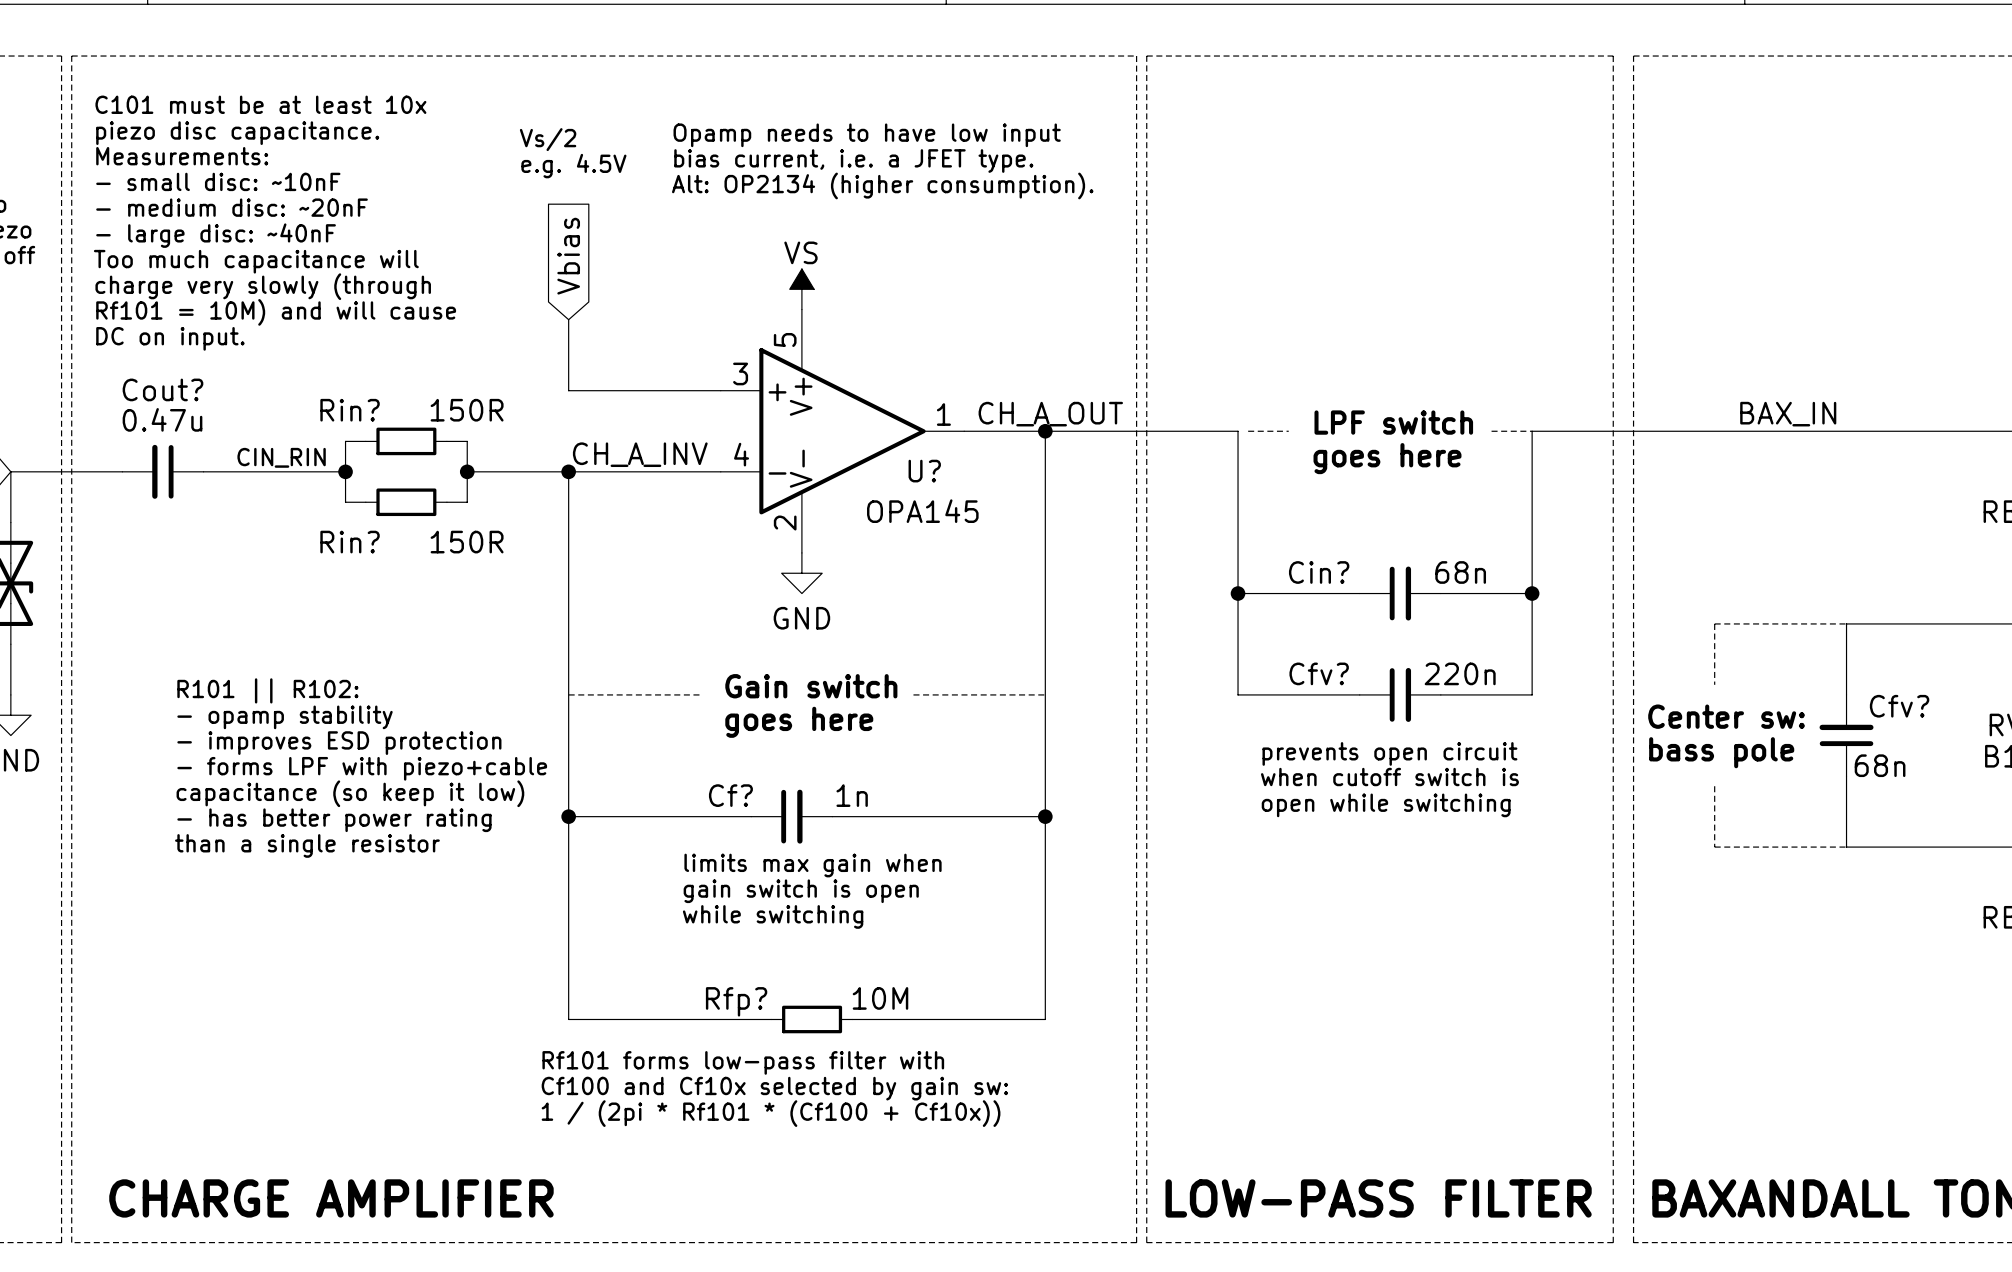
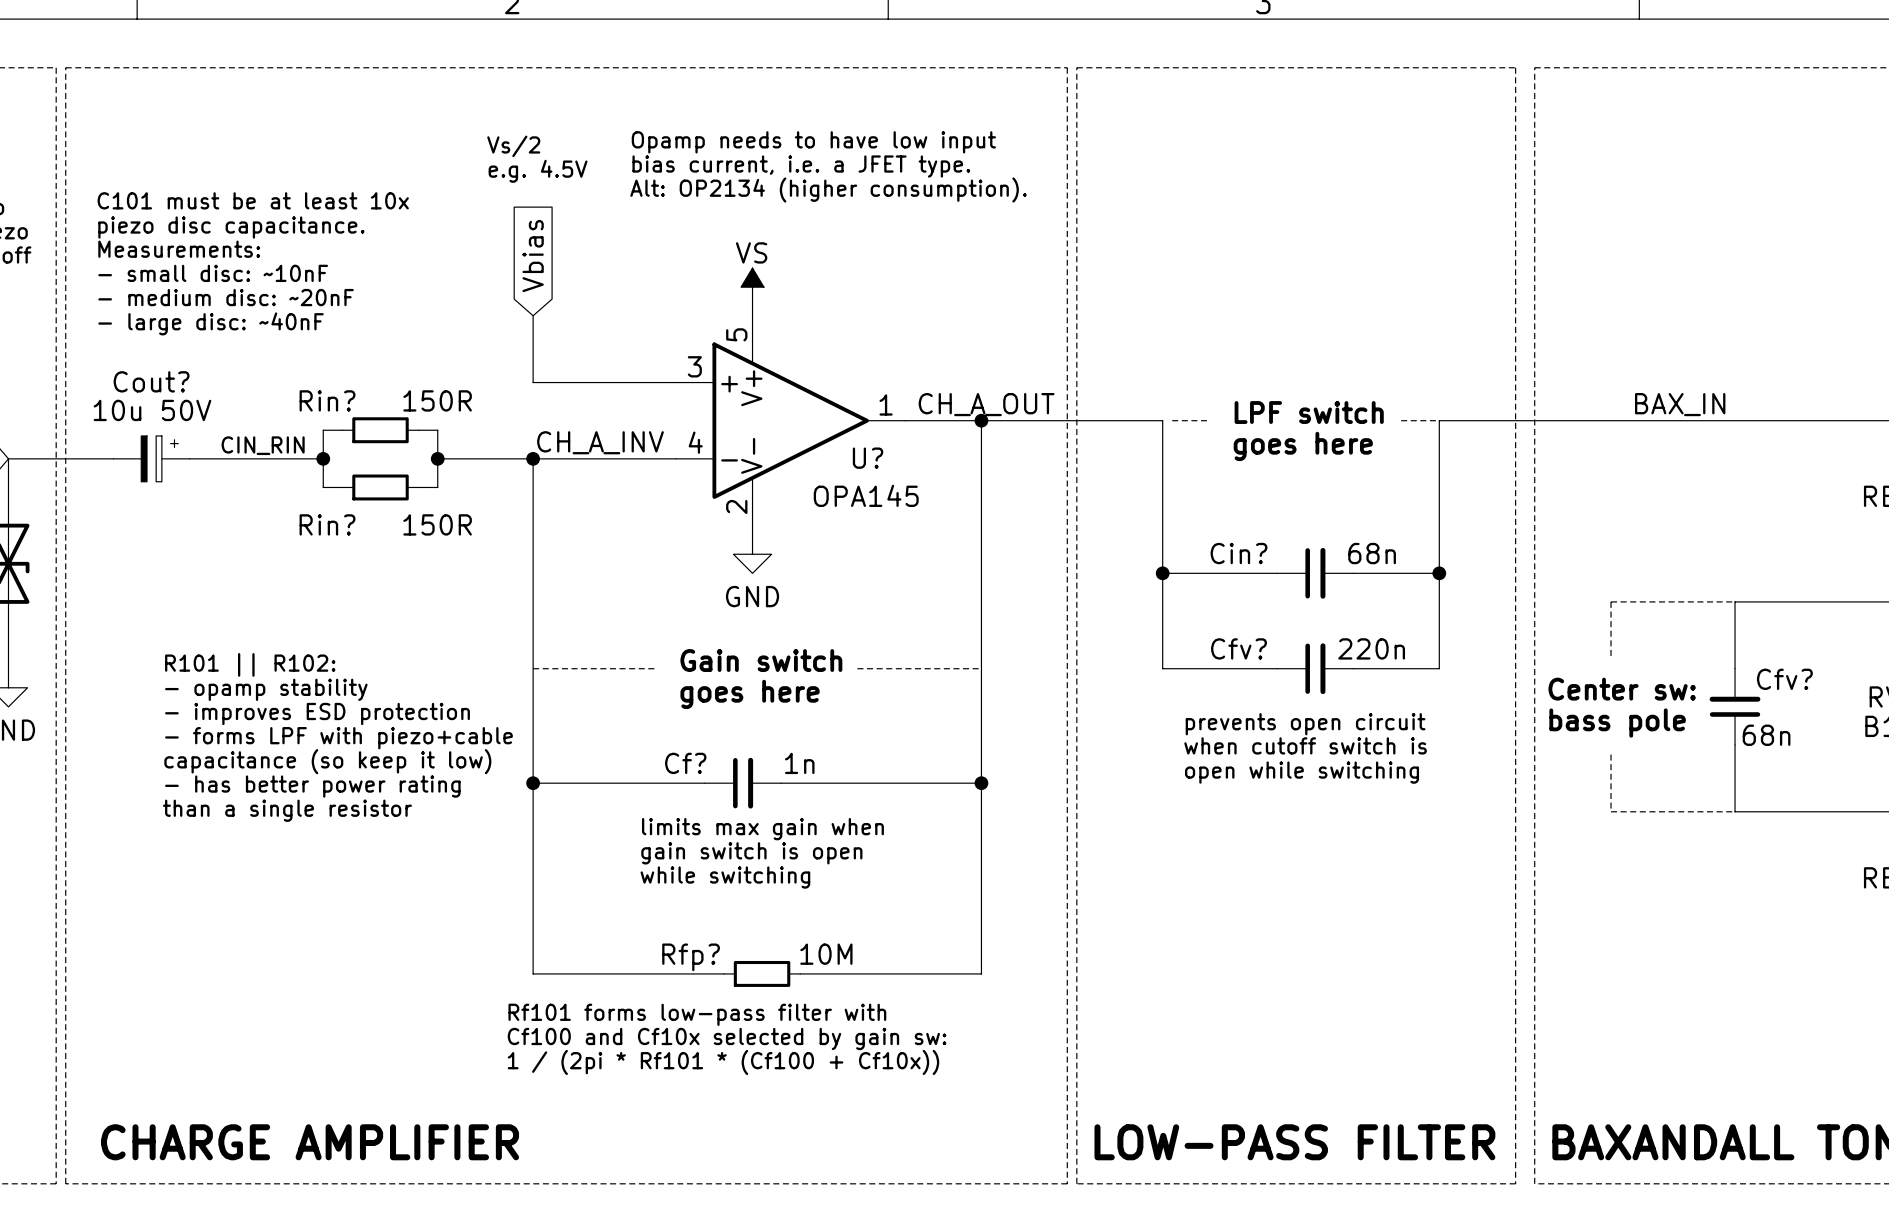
text position: C101 must be at least 10x (260, 104) -> C101 must be at least 10x (253, 200)
text position: piezo disc capacitance. (237, 133) -> piezo disc capacitance. (231, 227)
text position: Measurements: (182, 156) -> Measurements: (179, 249)
text position: - small disc: ~10nF (218, 181) -> - small disc: ~10nF (213, 273)
text position: - medium disc: ~20nF (232, 207) -> - medium disc: ~20nF (226, 297)
text position: - large disc: ~40nF (216, 235) -> - large disc: ~40nF (211, 323)
text: Too much capacitance will (256, 261) -> none
text: charge very slowly (through (263, 286) -> none
text: Rf101 = 10M) and will cause (276, 312) -> none
text: DC on input. (170, 338) -> none
Cout? value: 0.47u (162, 419) -> 10u 50V (152, 410)
Cout? symbol: [122, 444, 204, 499] -> [113, 435, 190, 482]

